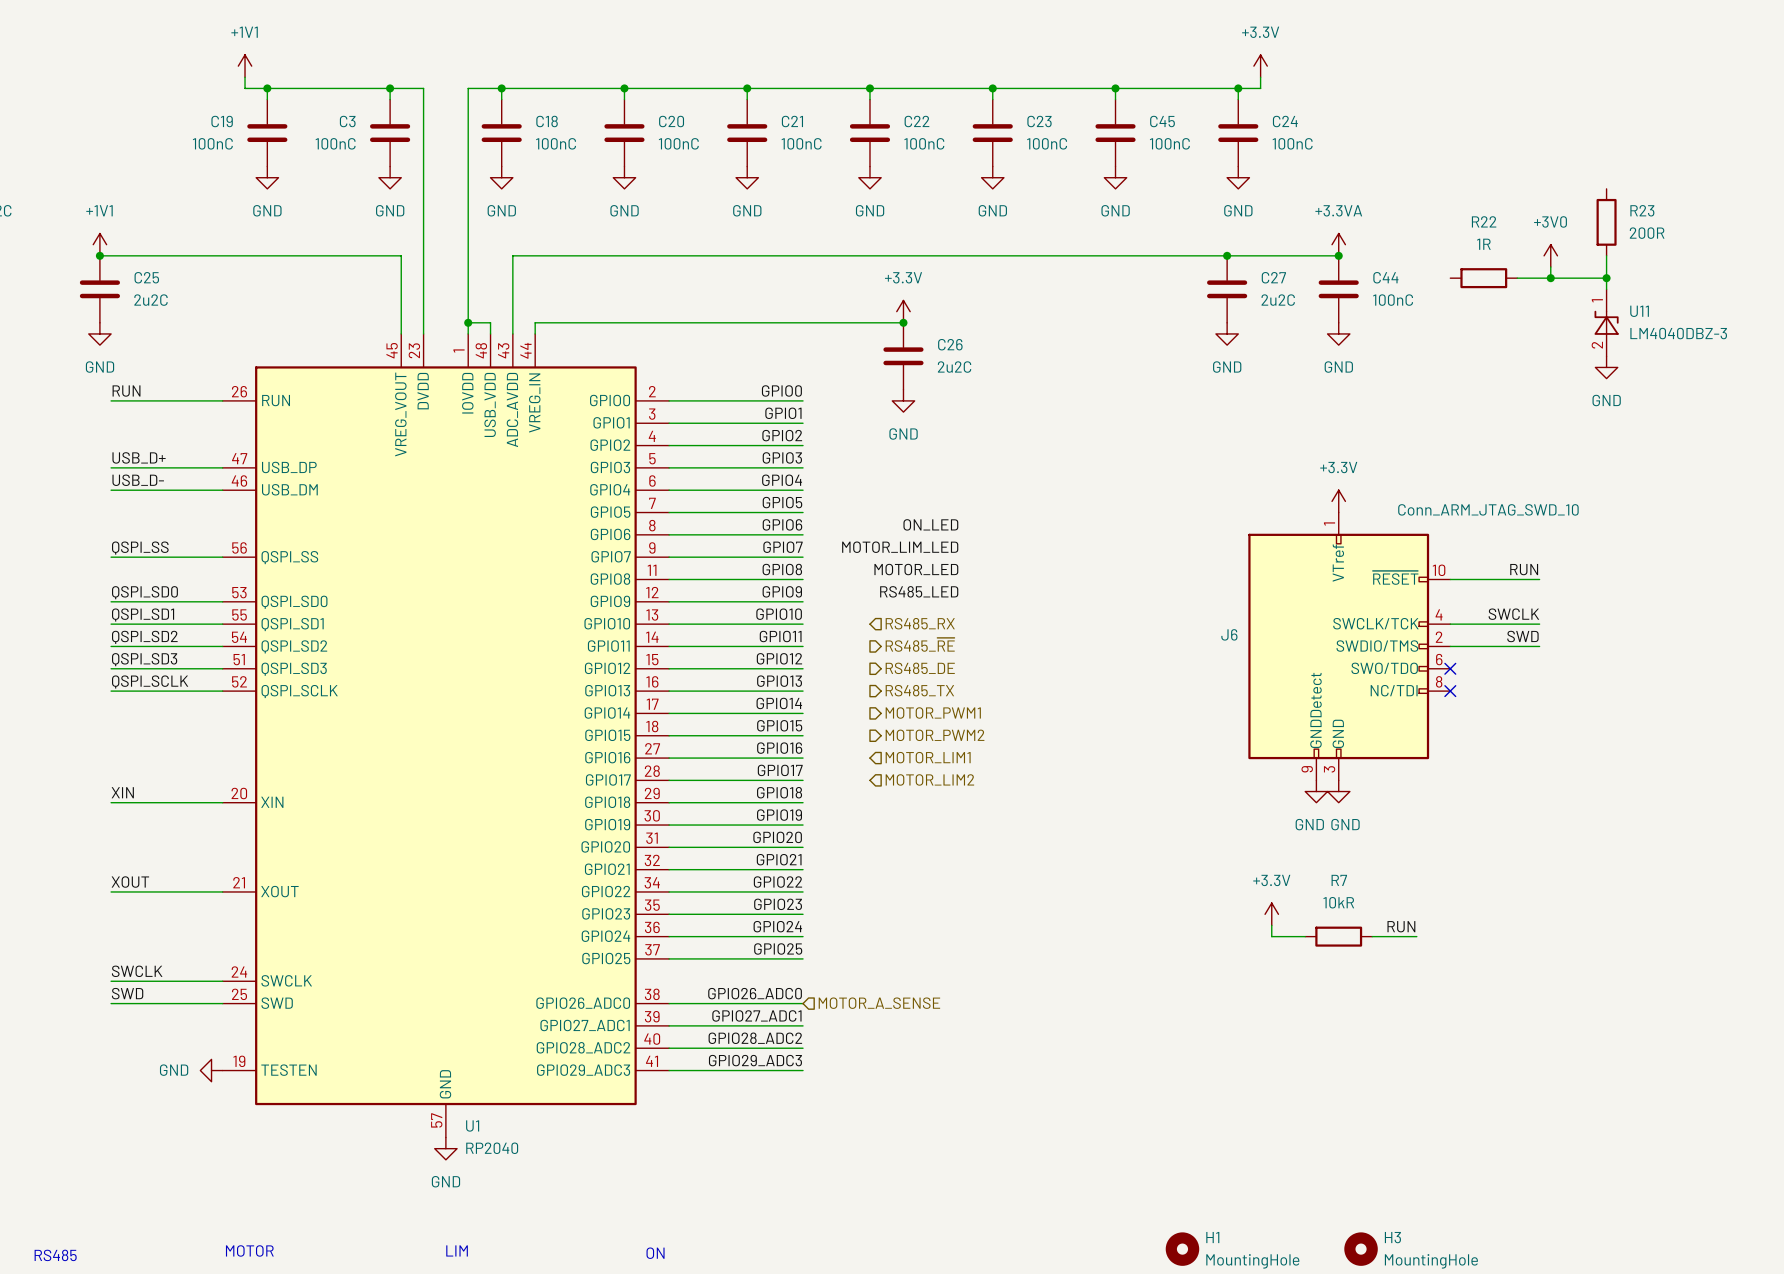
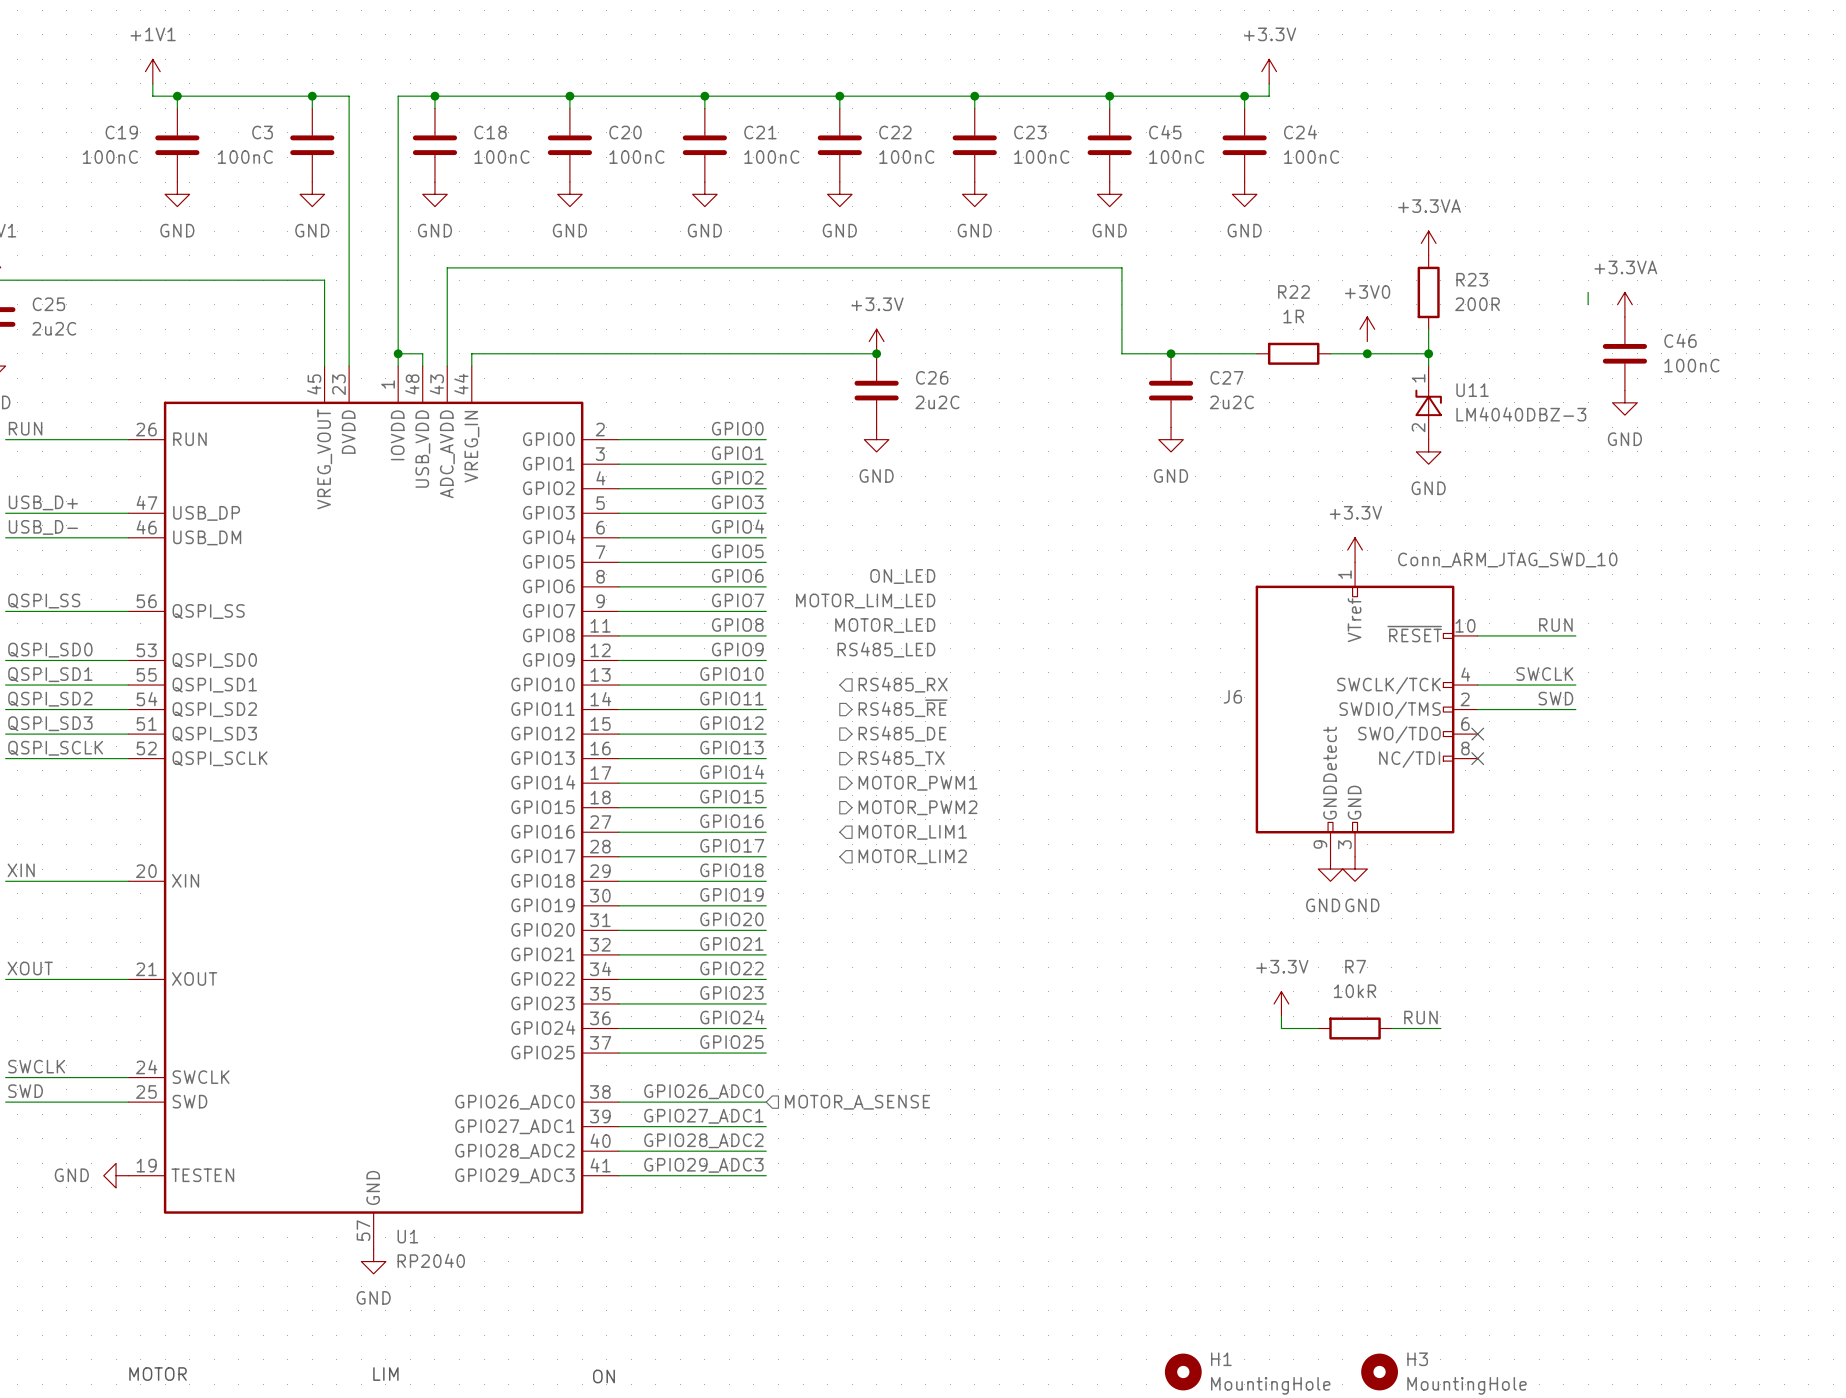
R23 position: (1606, 222) -> (1428, 292)
power symbol position: +3.3VA (1338, 244) -> +3.3VA (1428, 243)
wire: (512, 255) (1338, 255) -> (447, 280) (447, 267) (1121, 267) (1121, 353) (1256, 353)
junction: (1227, 255) -> none
junction: (1338, 255) -> none
power symbol position: +3V0 (1550, 255) -> +3V0 (1367, 329)
wire: (1606, 255) (1606, 289) -> (1428, 329) (1428, 366)
R22 position: (1483, 278) -> (1293, 353)
wire: (1517, 278) (1606, 278) -> (1330, 353) (1428, 353)
junction: (1550, 278) -> none
power symbol: none -> +3.3VA (1624, 304)
junction: (1606, 278) -> none
C27 position: (1227, 289) -> (1171, 390)
C44: 100nC (1338, 289) -> none
junction: none -> (1171, 353)
junction: none -> (1367, 353)
junction: none -> (1428, 353)
C46: none -> 100nC (1624, 353)
U11 position: (1606, 322) -> (1428, 402)
power symbol position: GND (1227, 333) -> GND (1171, 439)
power symbol: GND (1338, 333) -> none
power symbol position: GND (1606, 367) -> GND (1624, 402)
power symbol: none -> GND (1428, 451)

